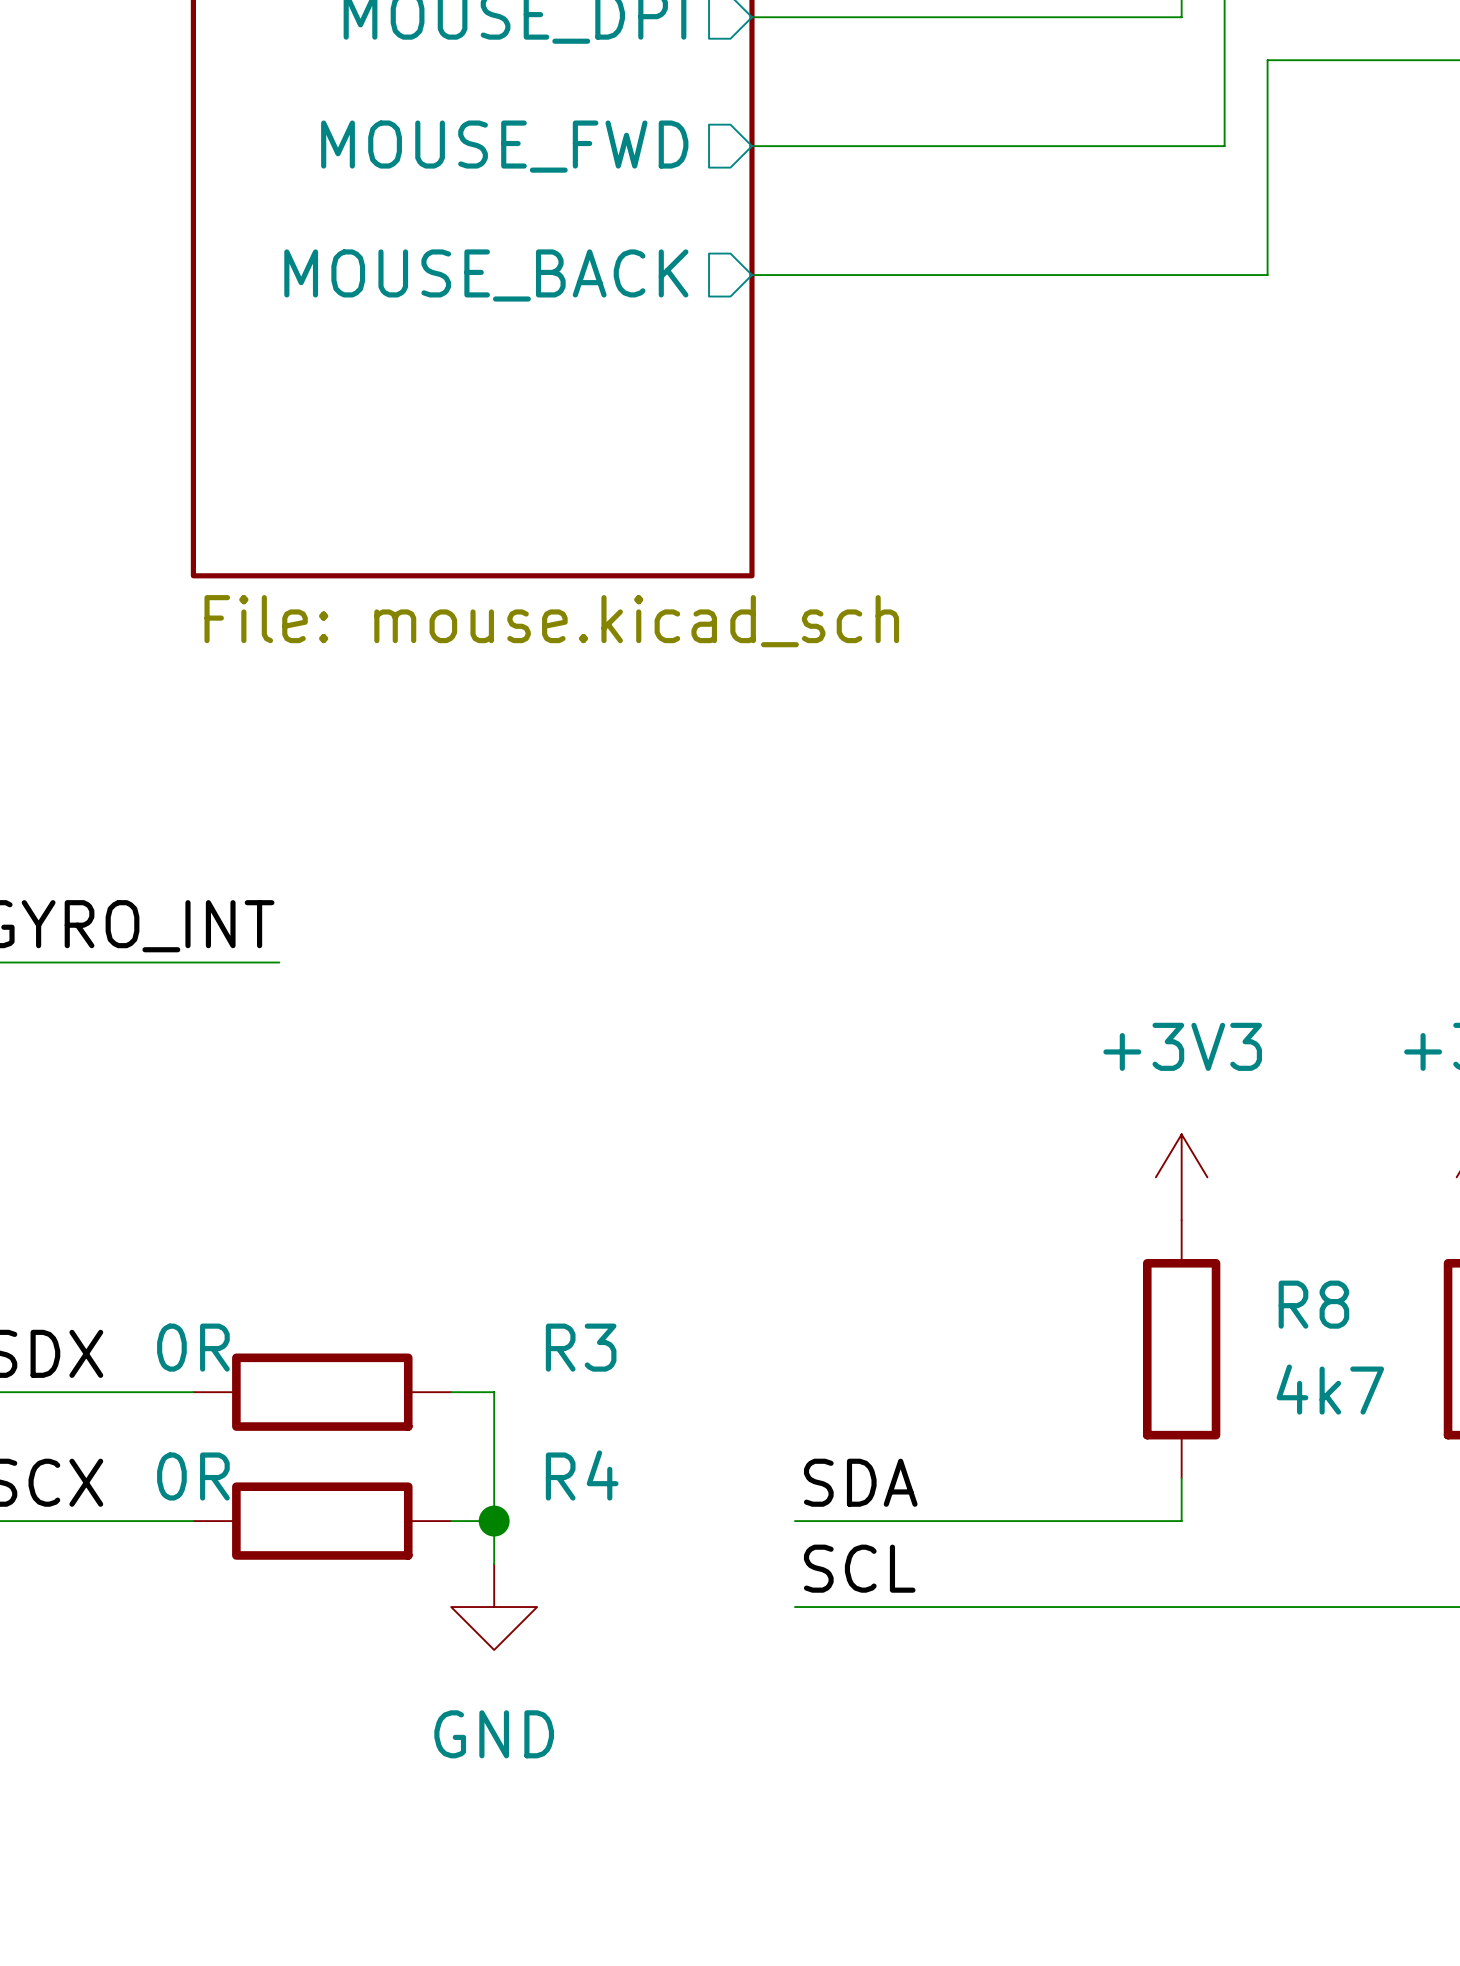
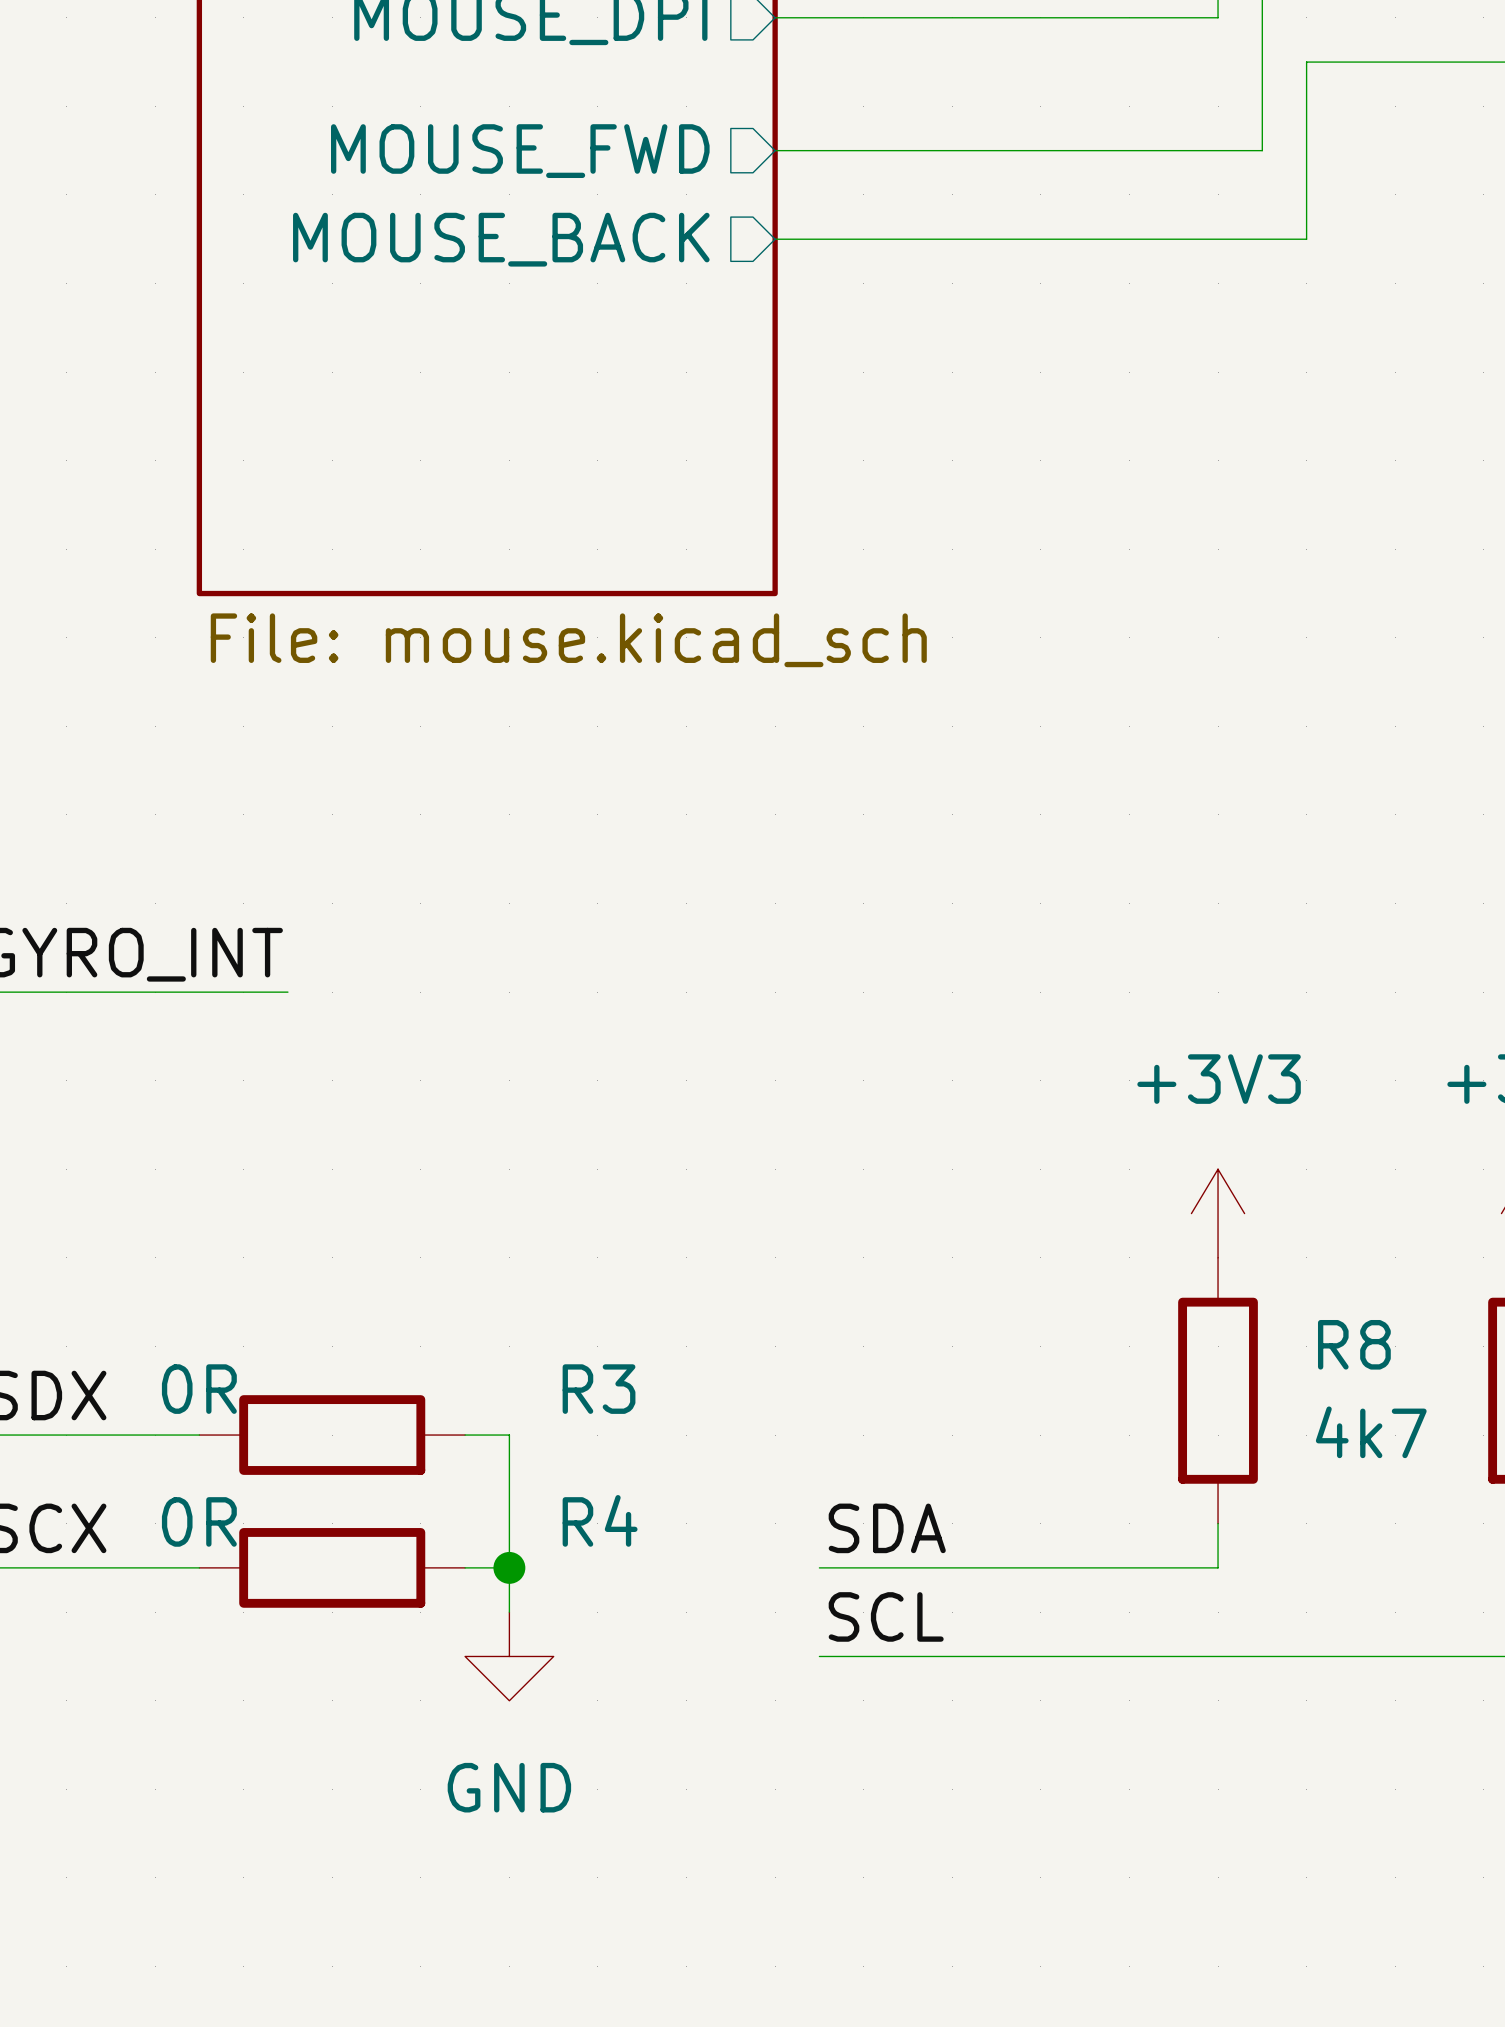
wire: (1267, 232) (1267, 275) (751, 275) -> (1306, 239) (775, 239)
sheet pin position: MOUSE_BACK (486, 275) -> MOUSE_BACK (501, 239)

